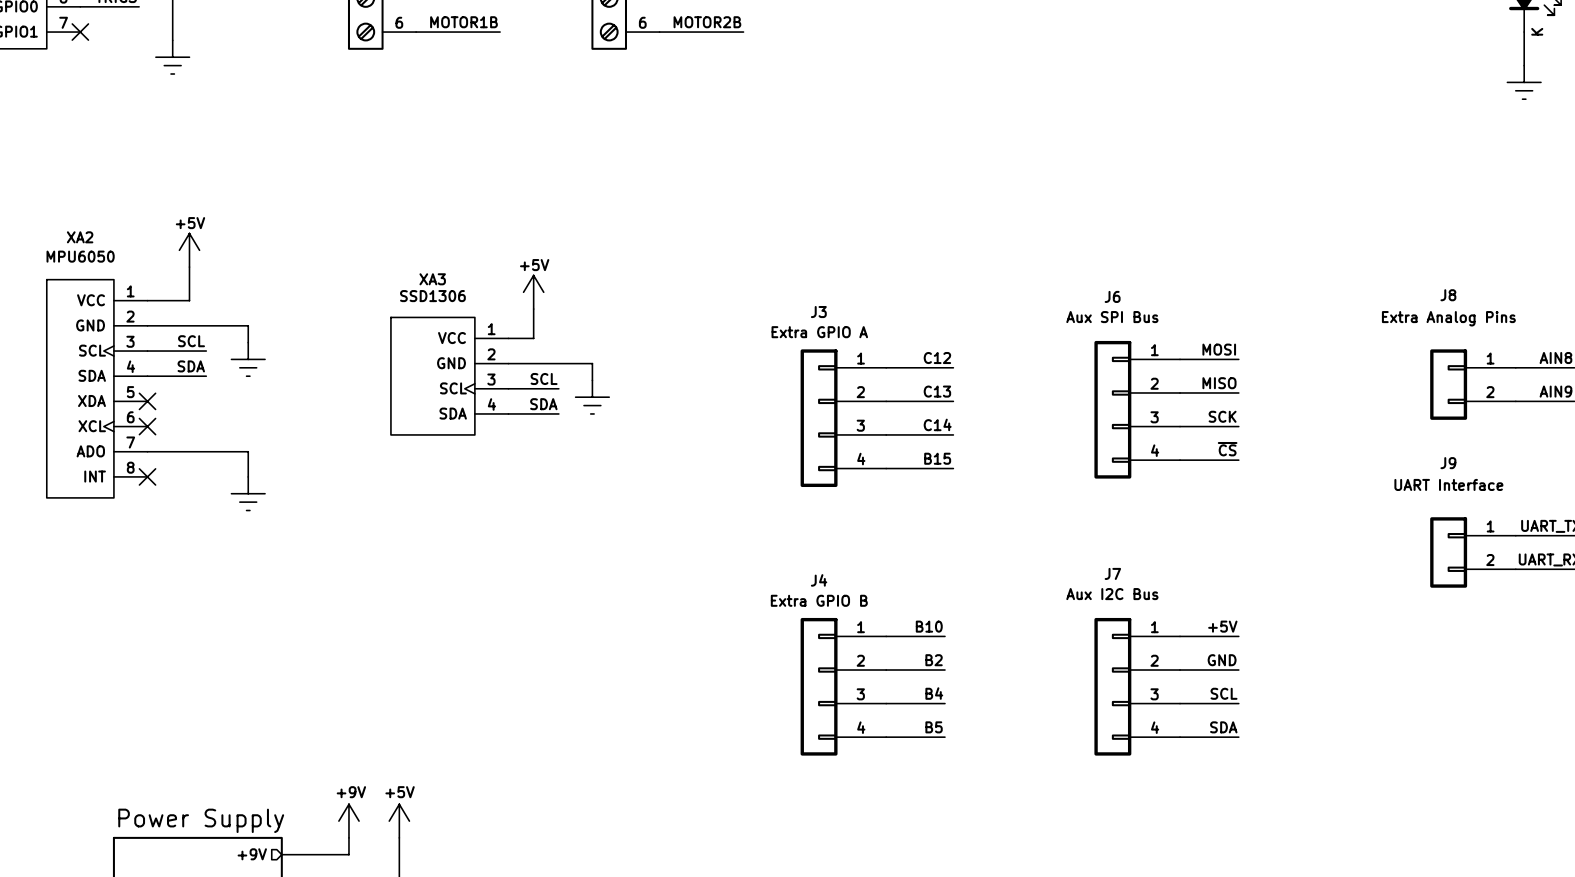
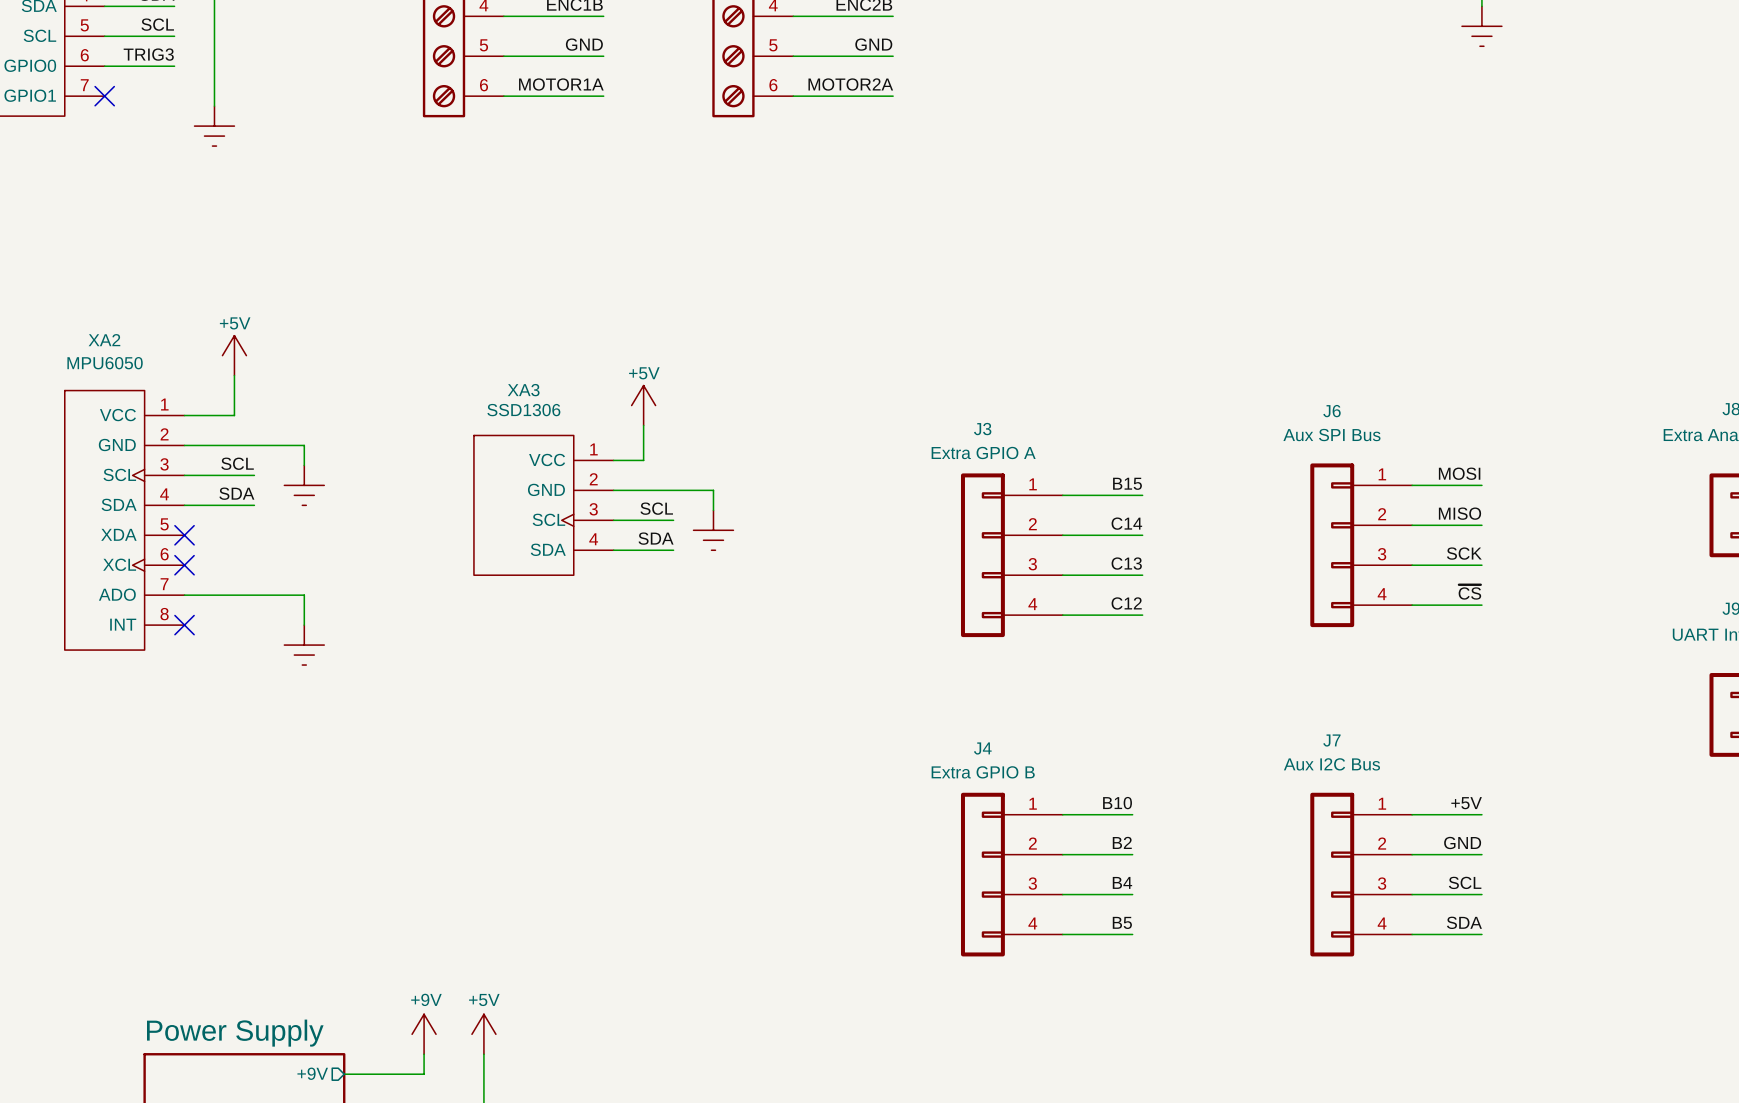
label: MOTOR1B (463, 22) -> MOTOR1A (561, 84)
label: MOTOR2B (707, 22) -> MOTOR2A (850, 84)
label: C12 (937, 358) -> B15 (1127, 483)
label: C13 (937, 391) -> C14 (1126, 523)
label: C14 (937, 424) -> C13 (1126, 563)
label: B15 (937, 458) -> C12 (1126, 603)

